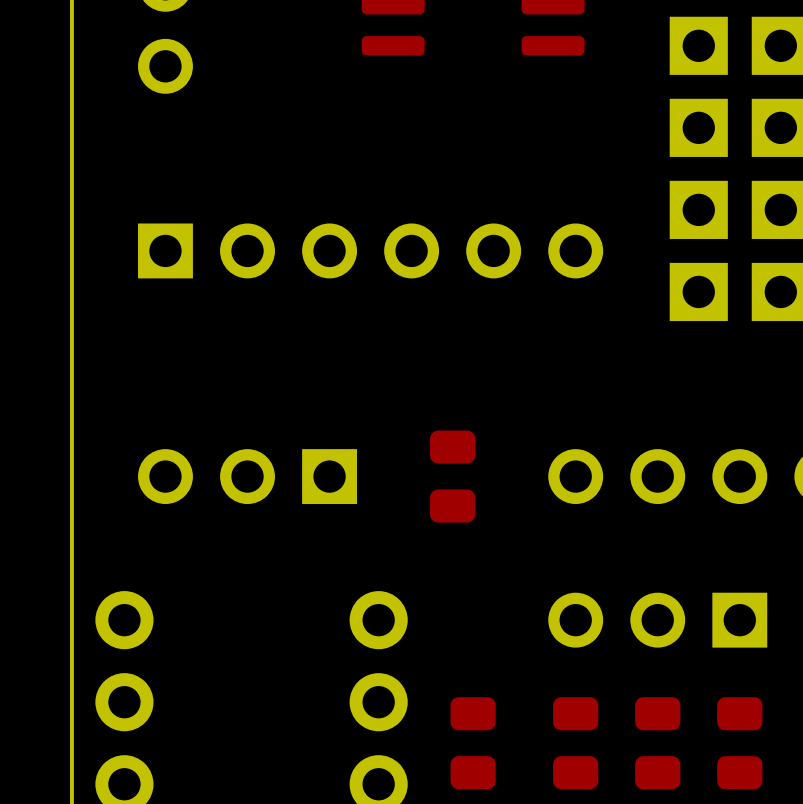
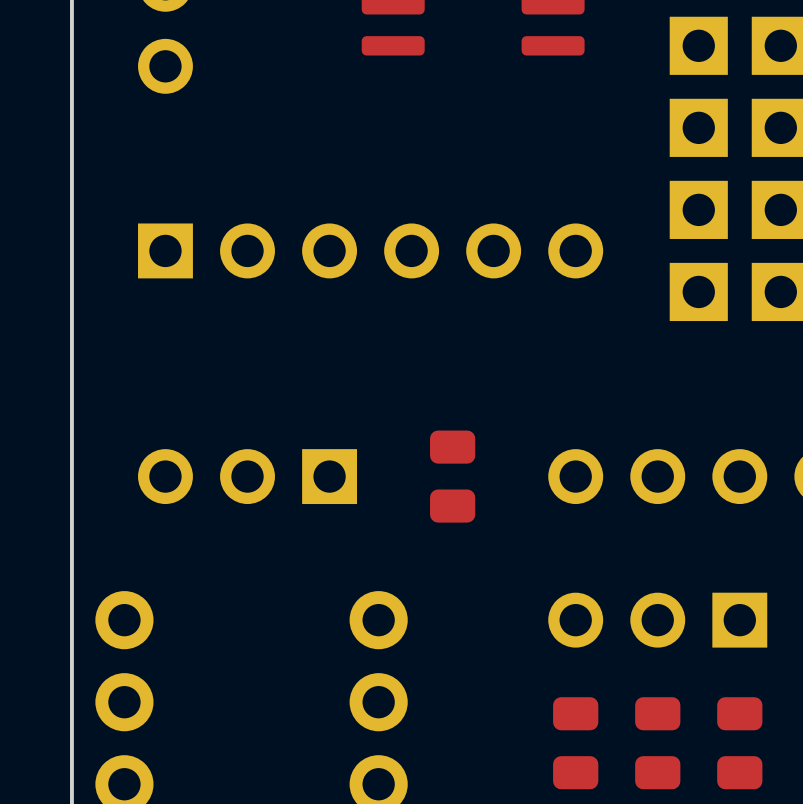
part: (473, 743) -> none

